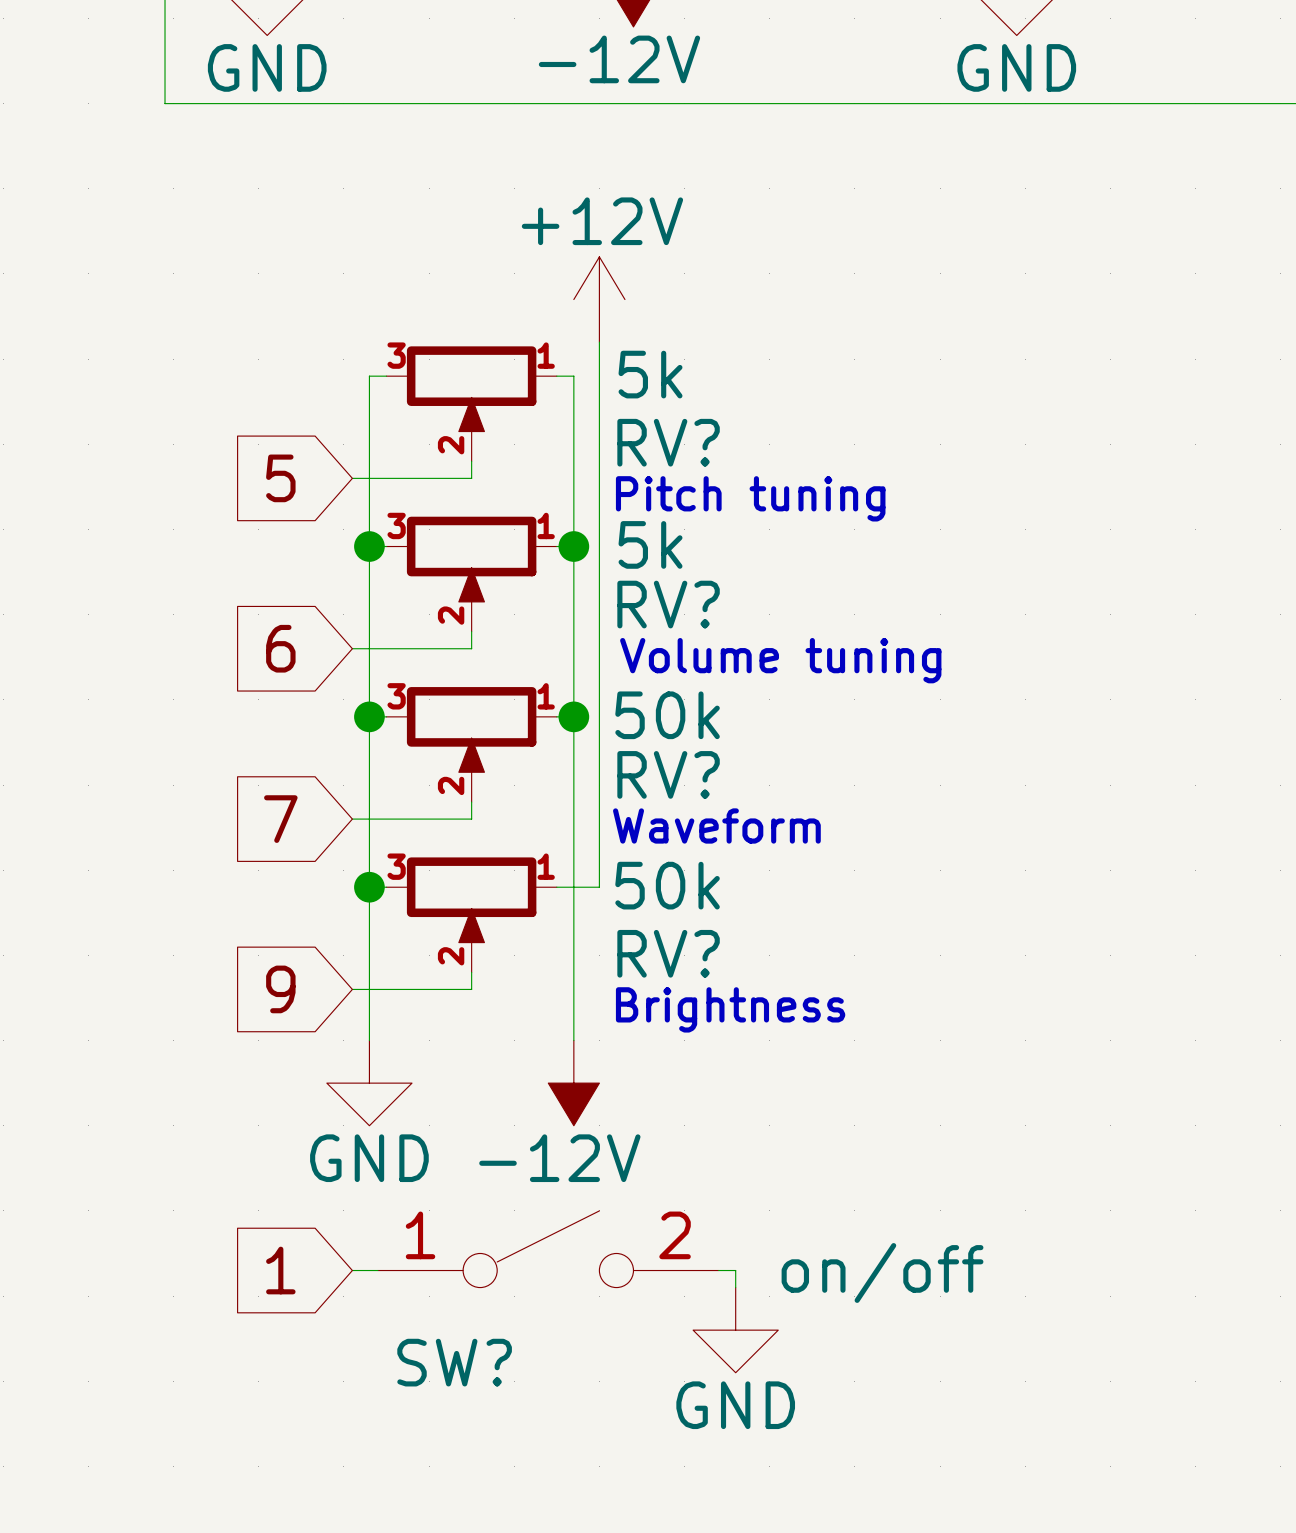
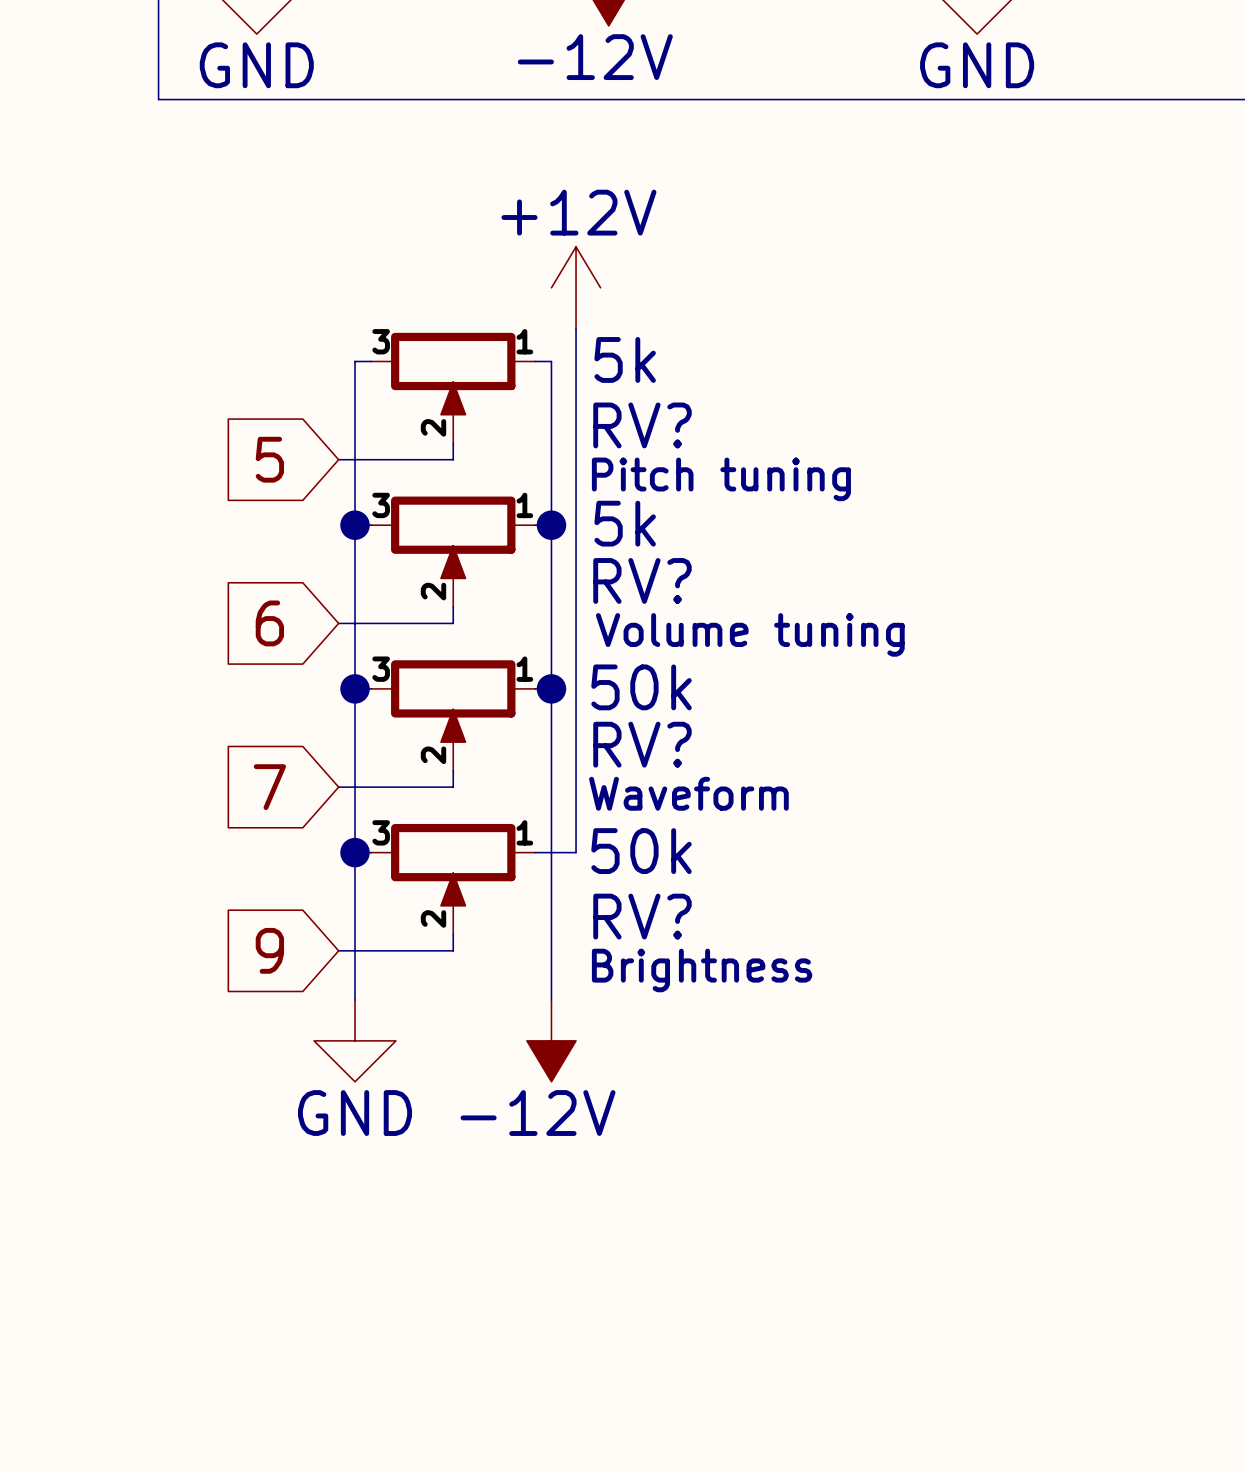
SW?: on/off (548, 1249) -> none
global label: 1 (280, 1270) -> none
wire: (352, 1270) (377, 1270) -> none
wire: (718, 1270) (735, 1270) (735, 1287) -> none
power symbol: GND (735, 1330) -> none

